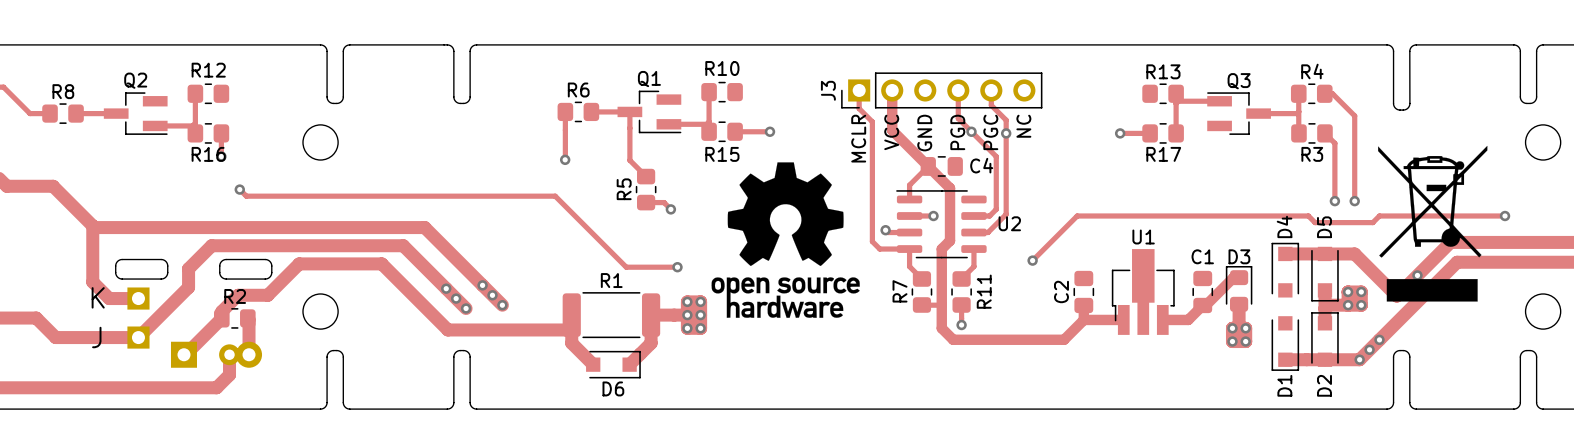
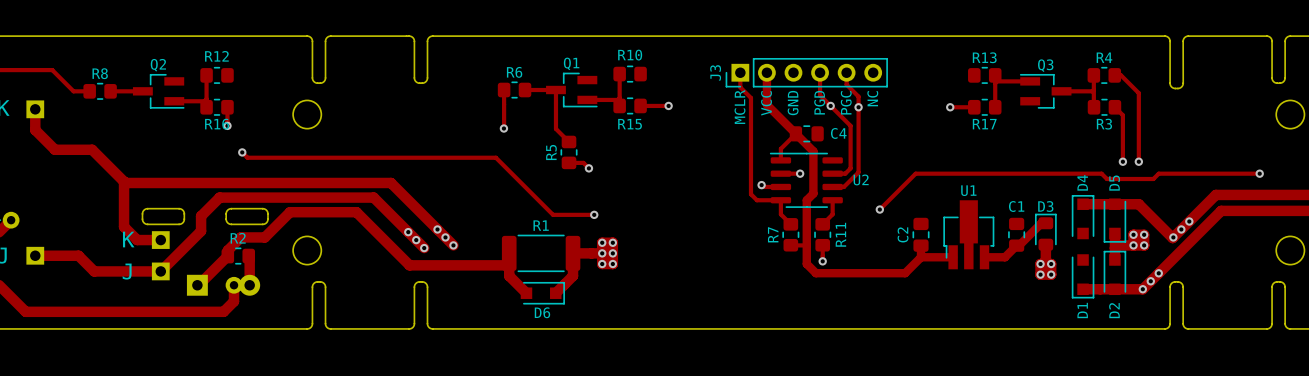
drawing: [1378, 145, 1488, 302] -> none
drawing: [711, 162, 860, 318] -> none

